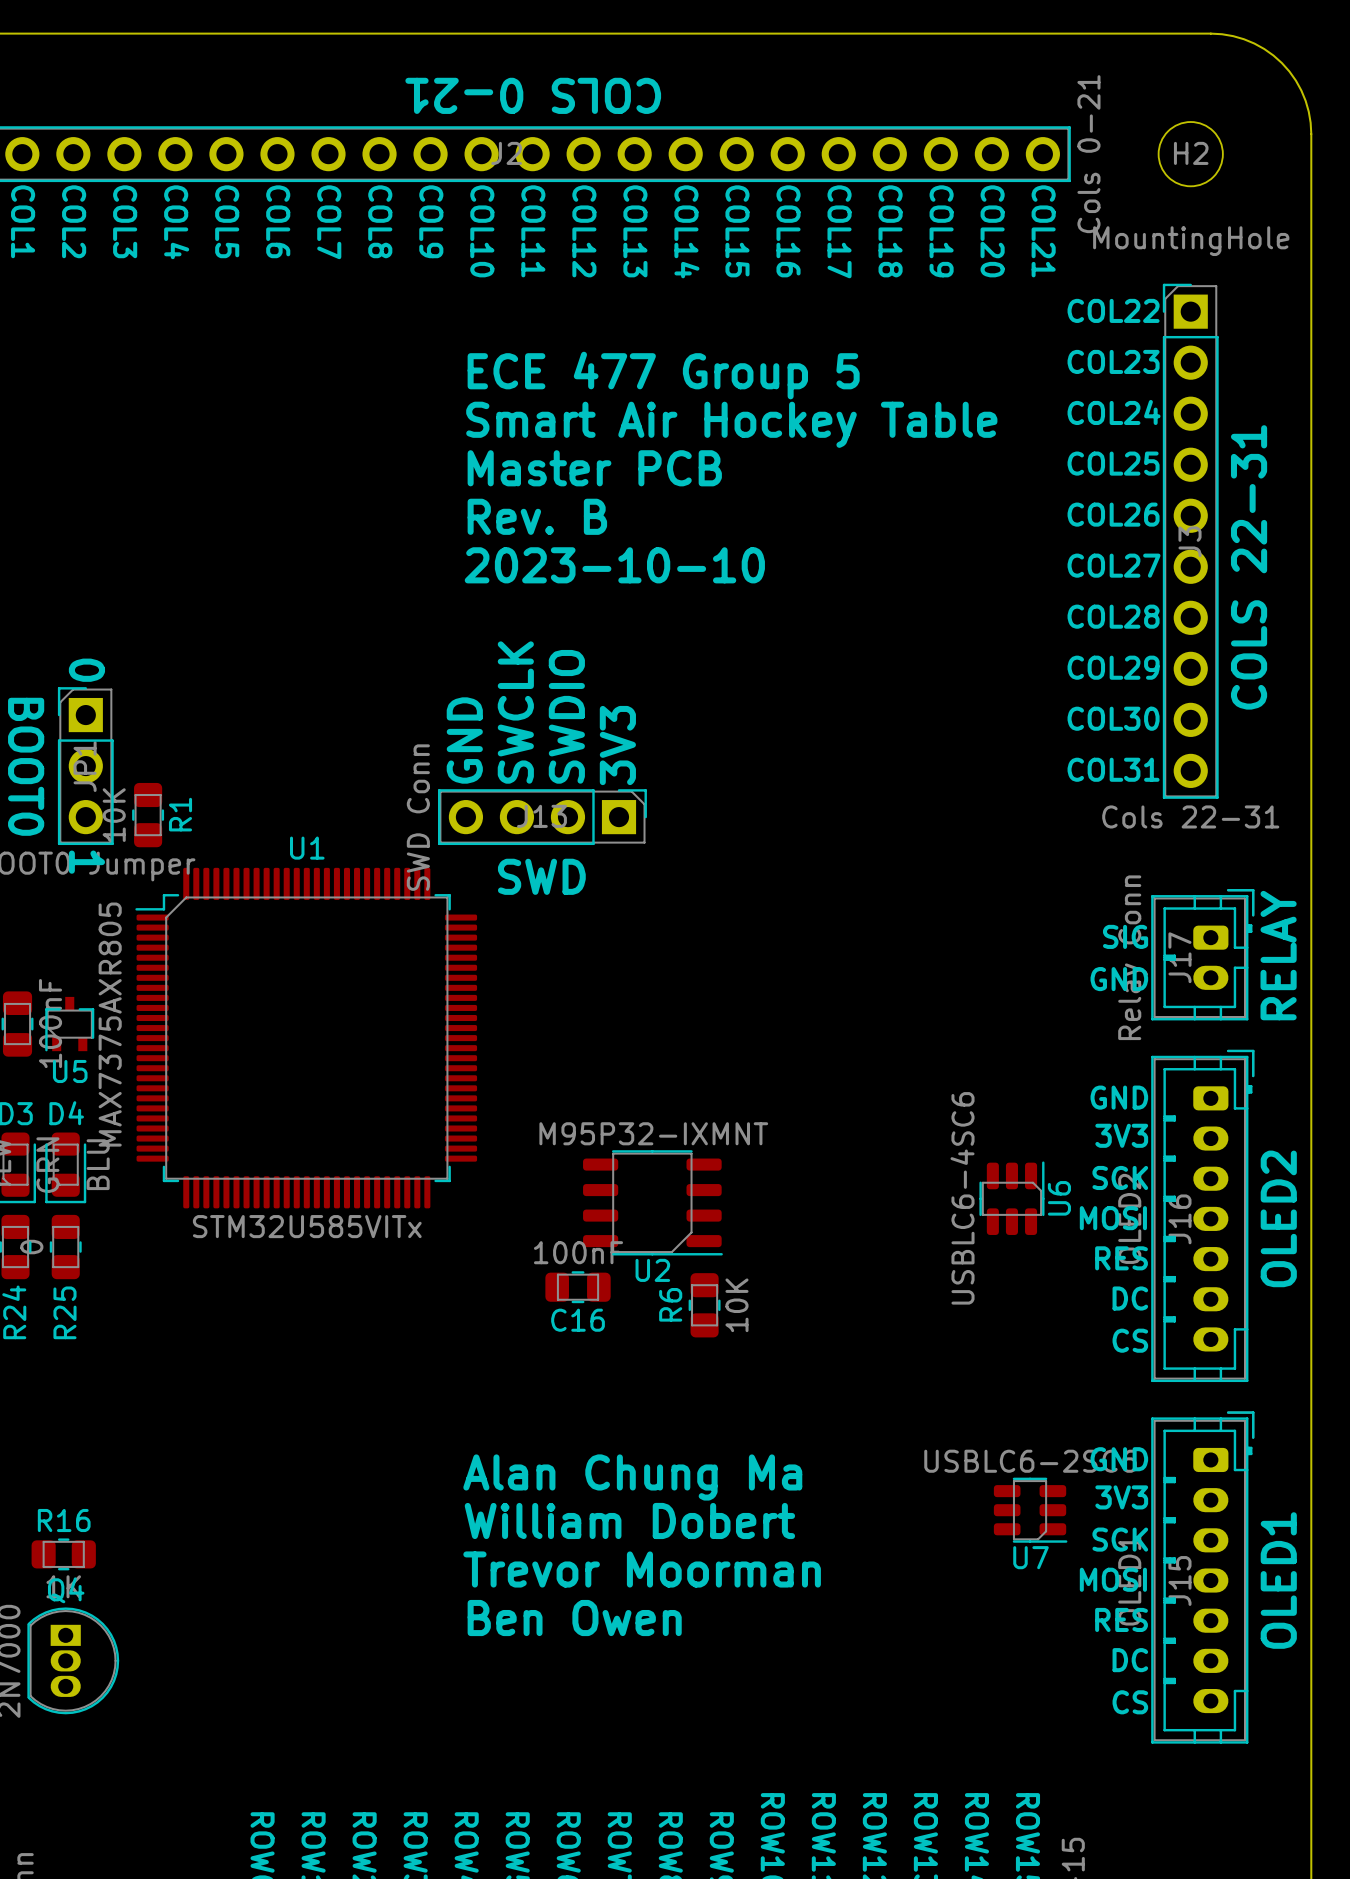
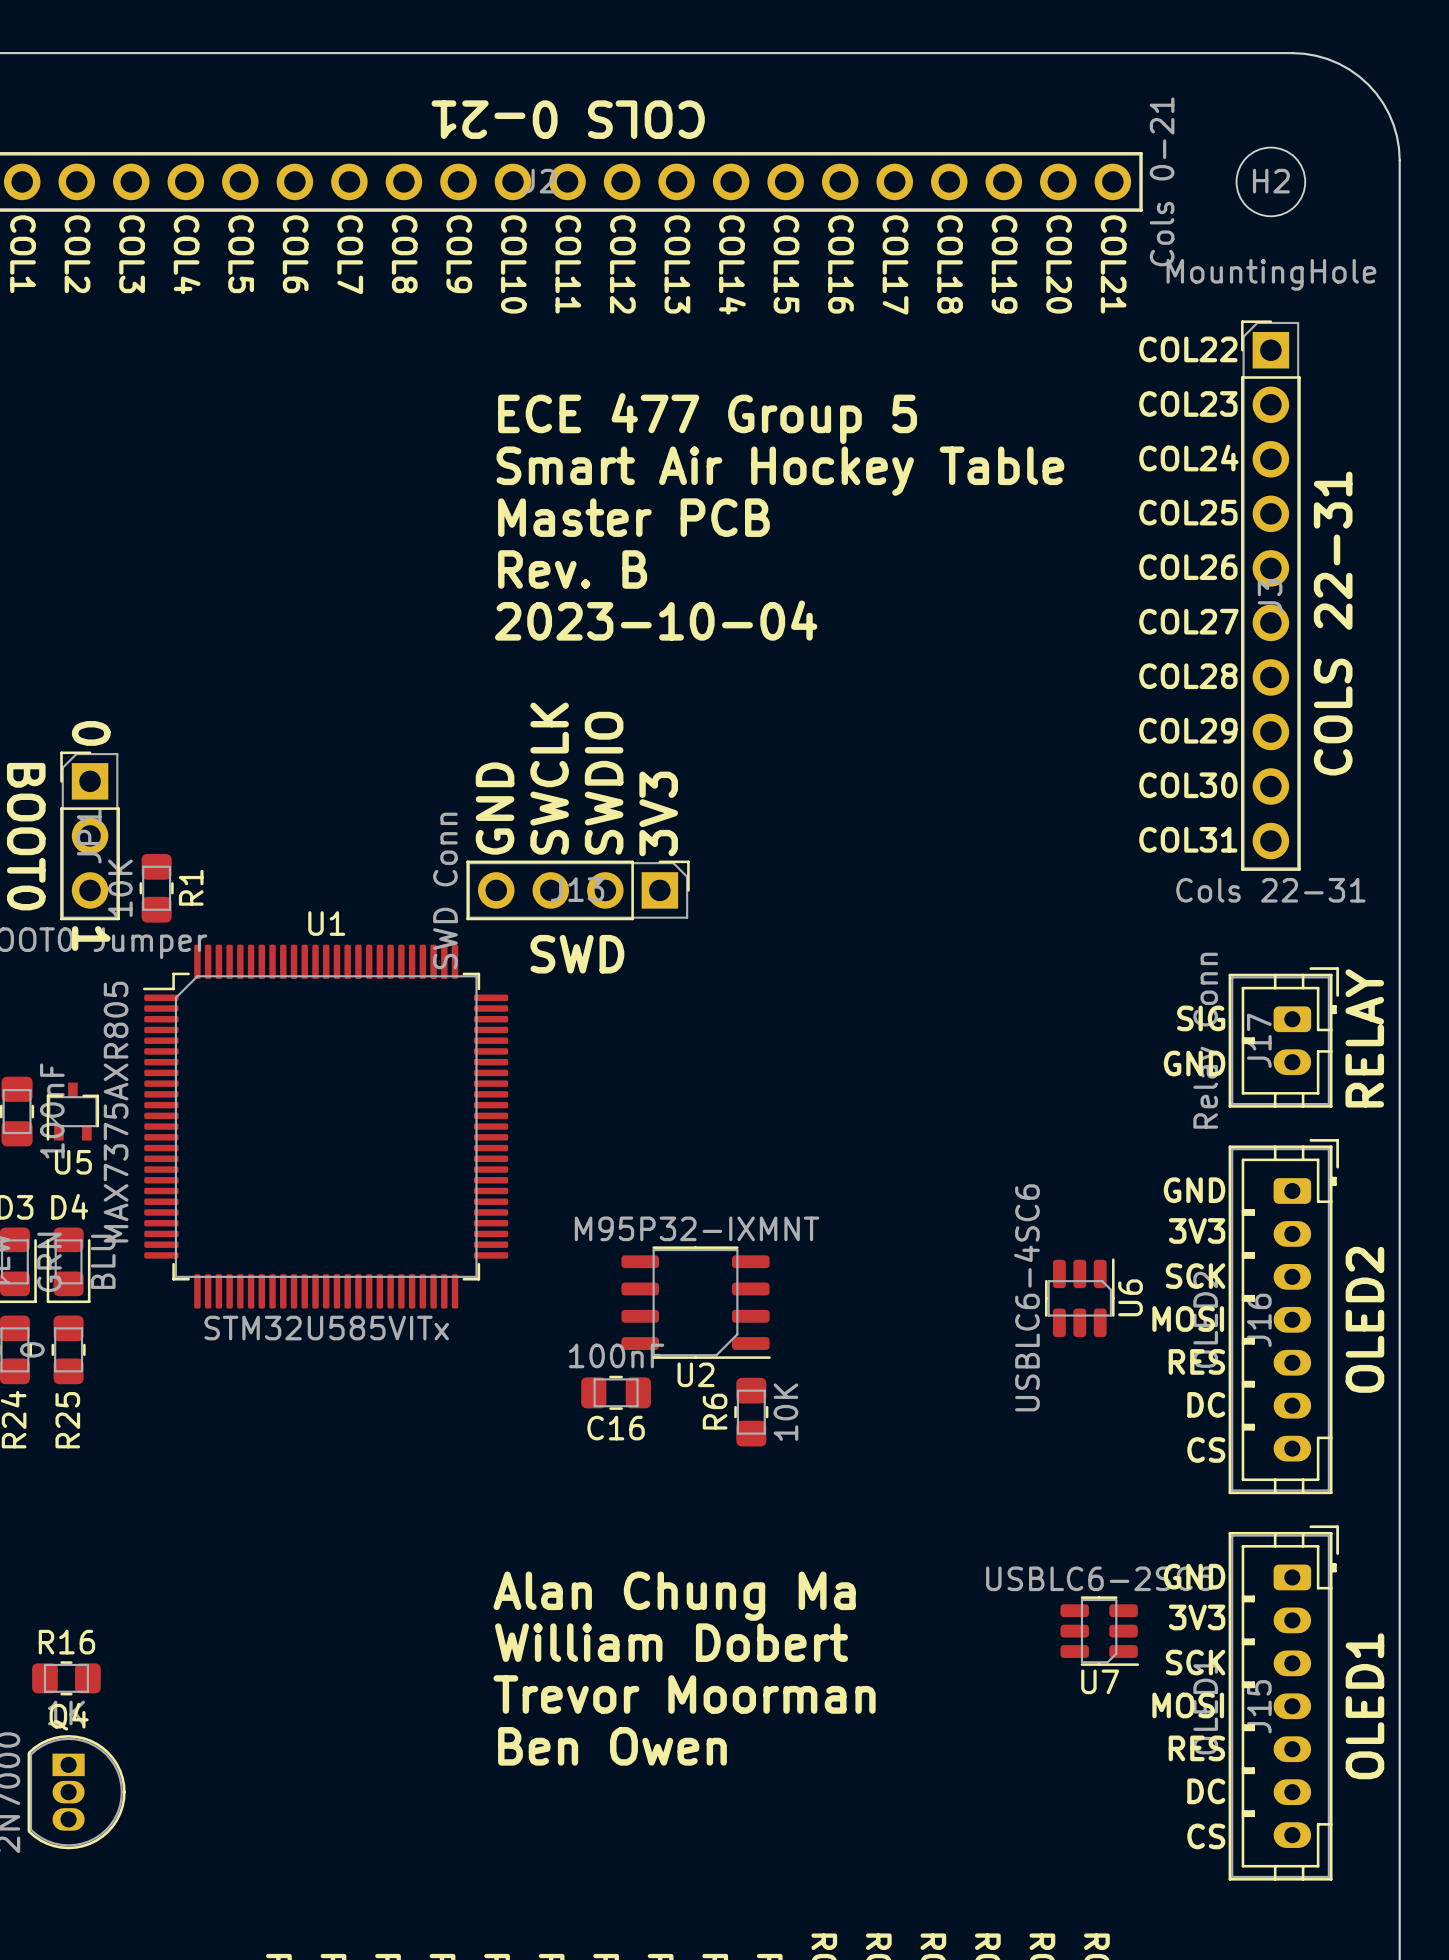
text: 2023-10-10 (614, 565) -> 2023-10-04 (656, 620)

